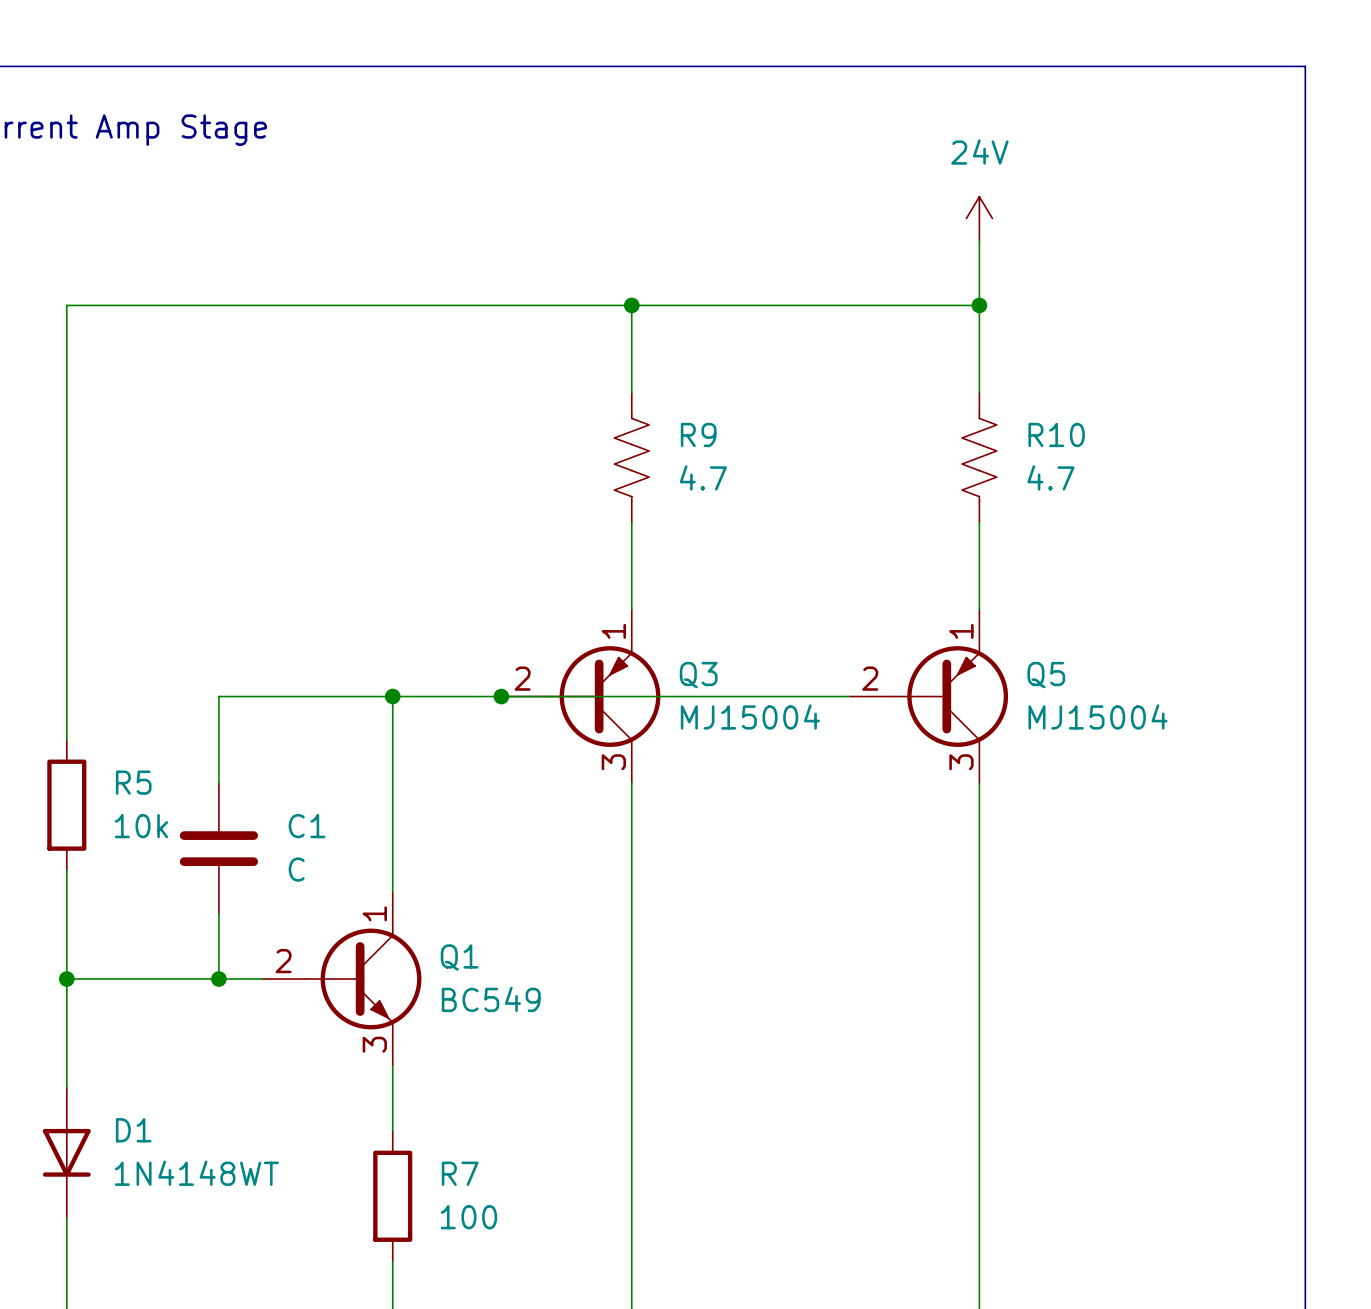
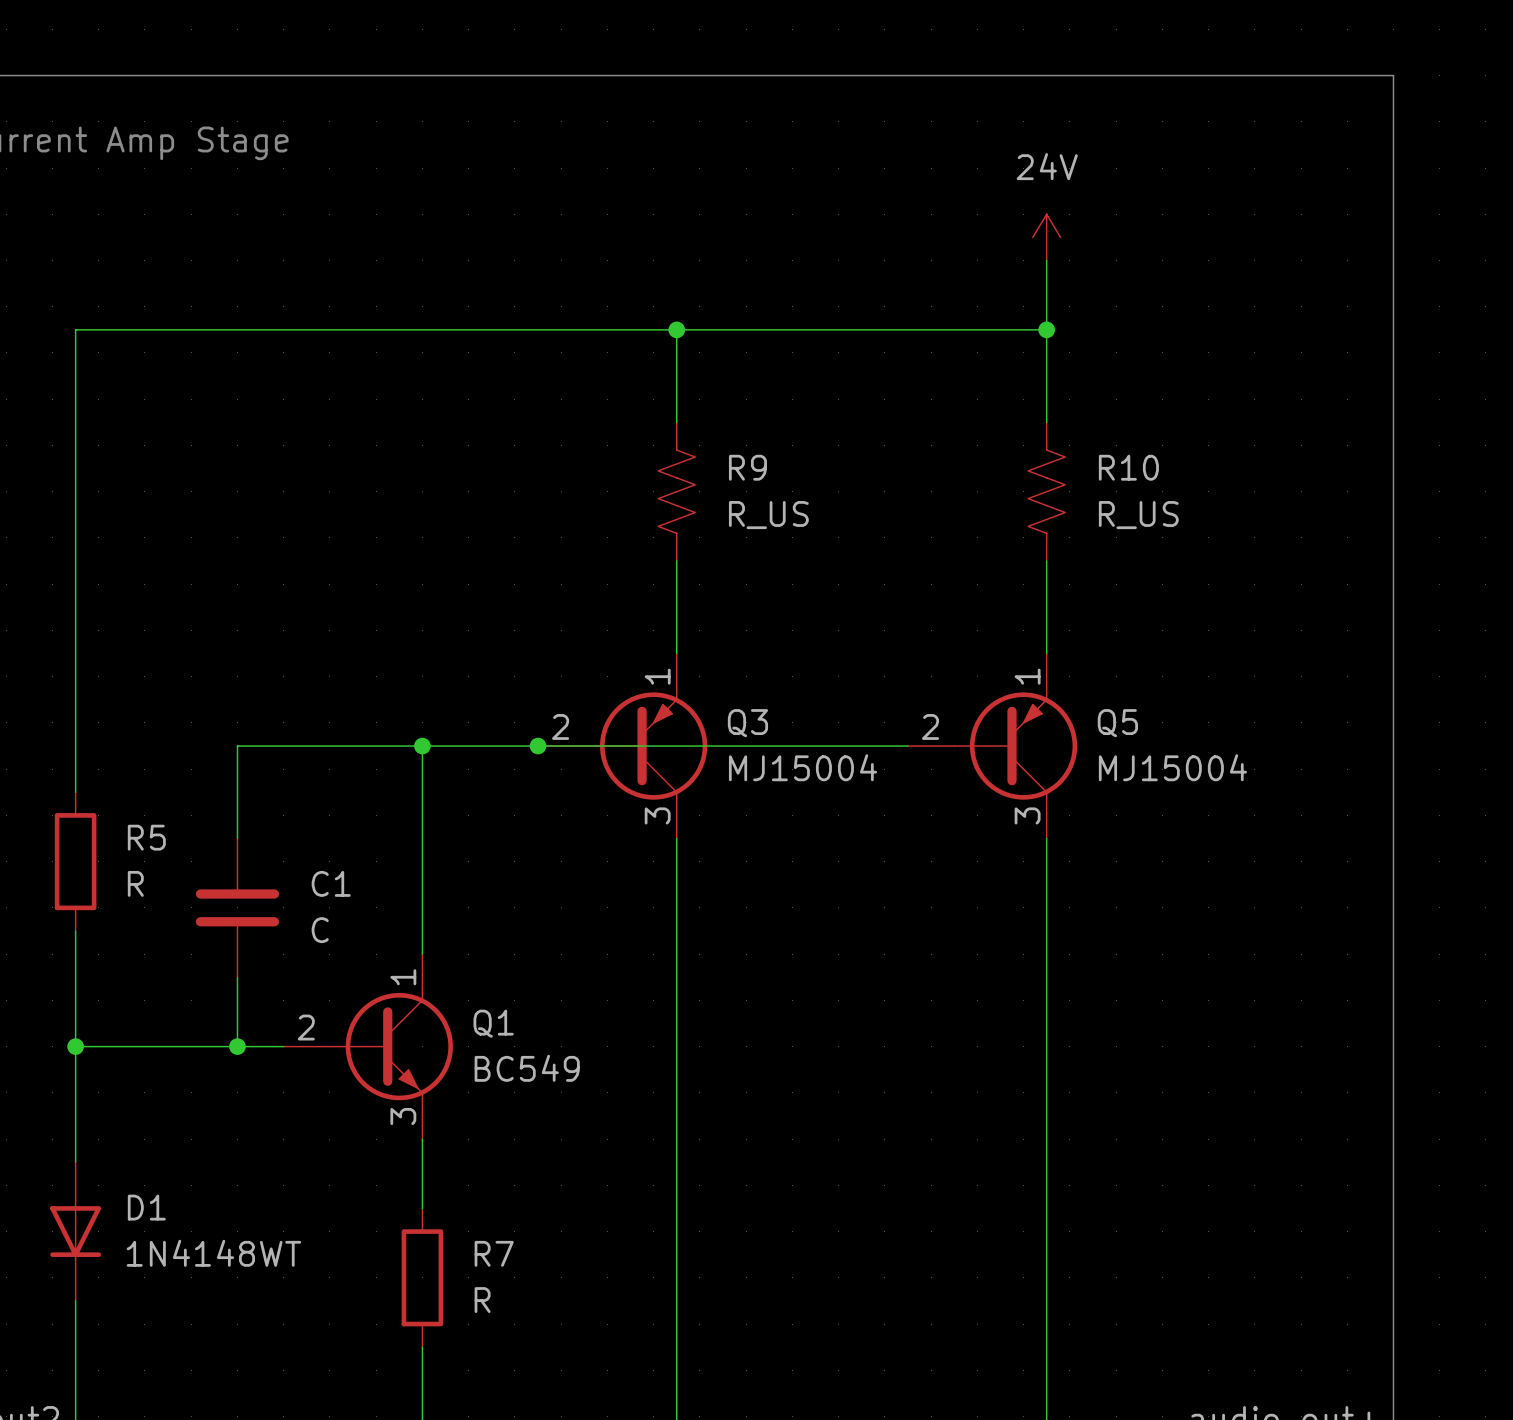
R9 value: 4.7 (703, 477) -> R_US (768, 515)
R10 value: 4.7 (1050, 477) -> R_US (1138, 515)
R5 value: 10k (141, 826) -> R (135, 883)
R7 value: 100 (468, 1217) -> R (482, 1300)

